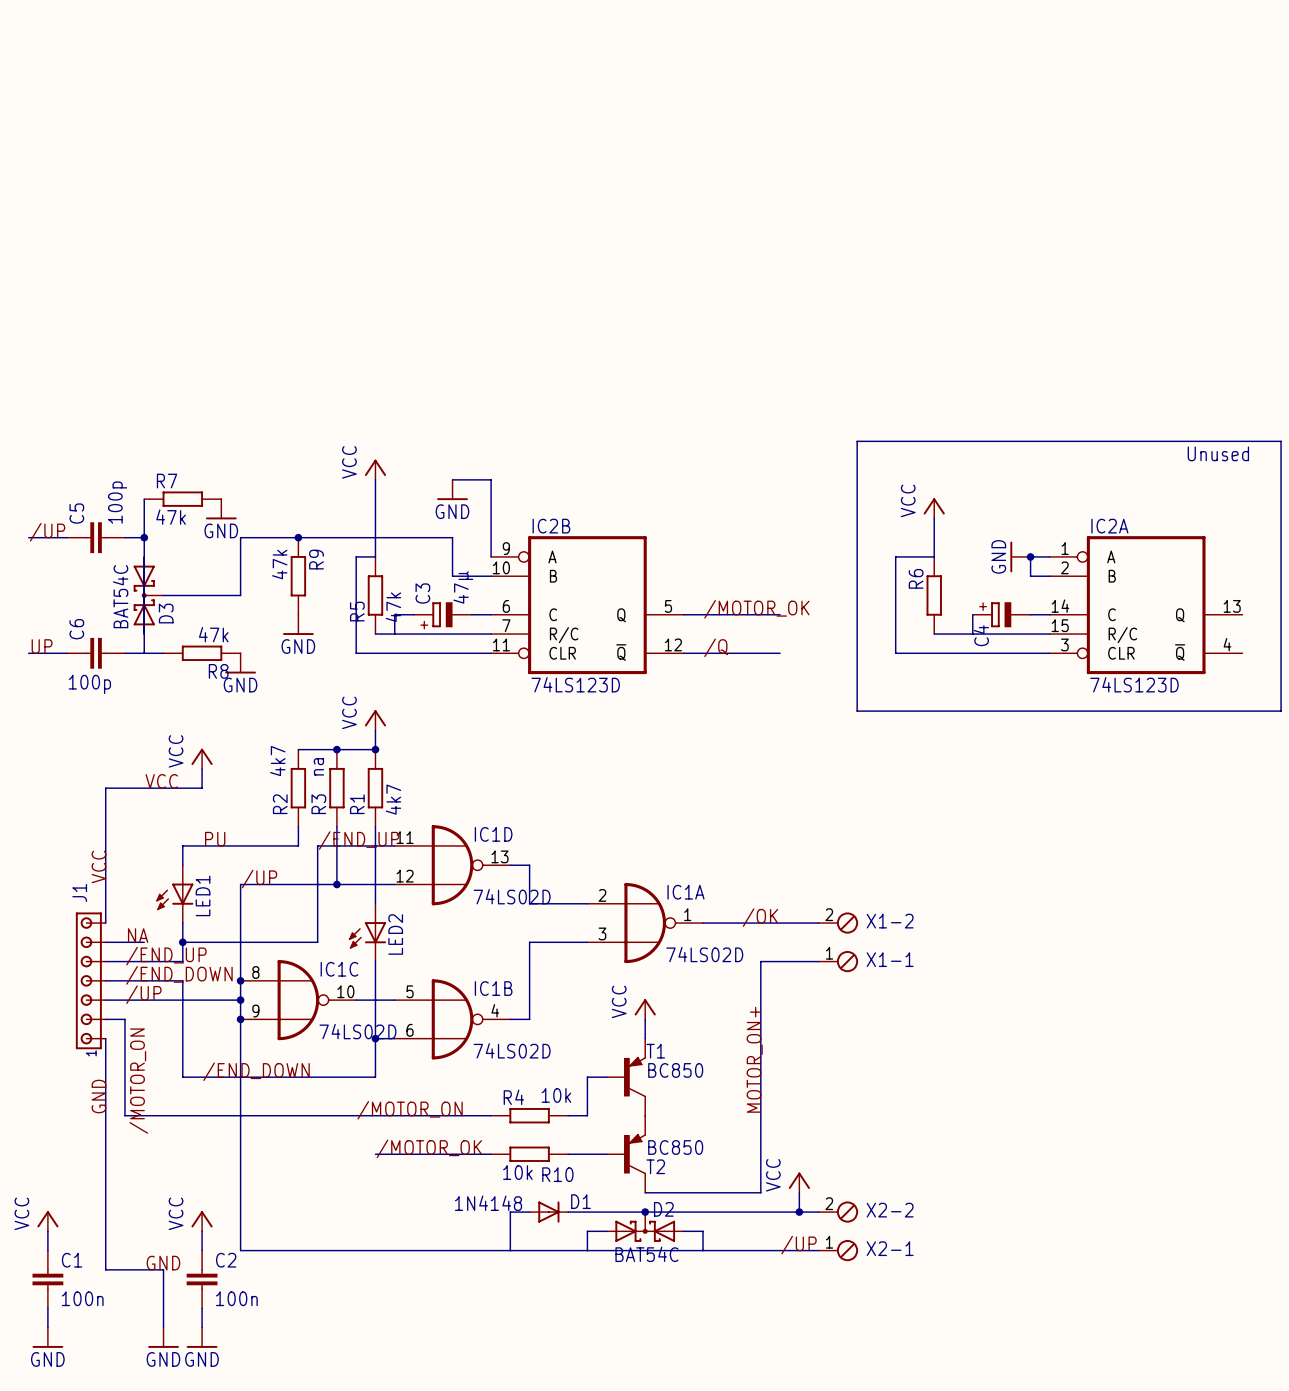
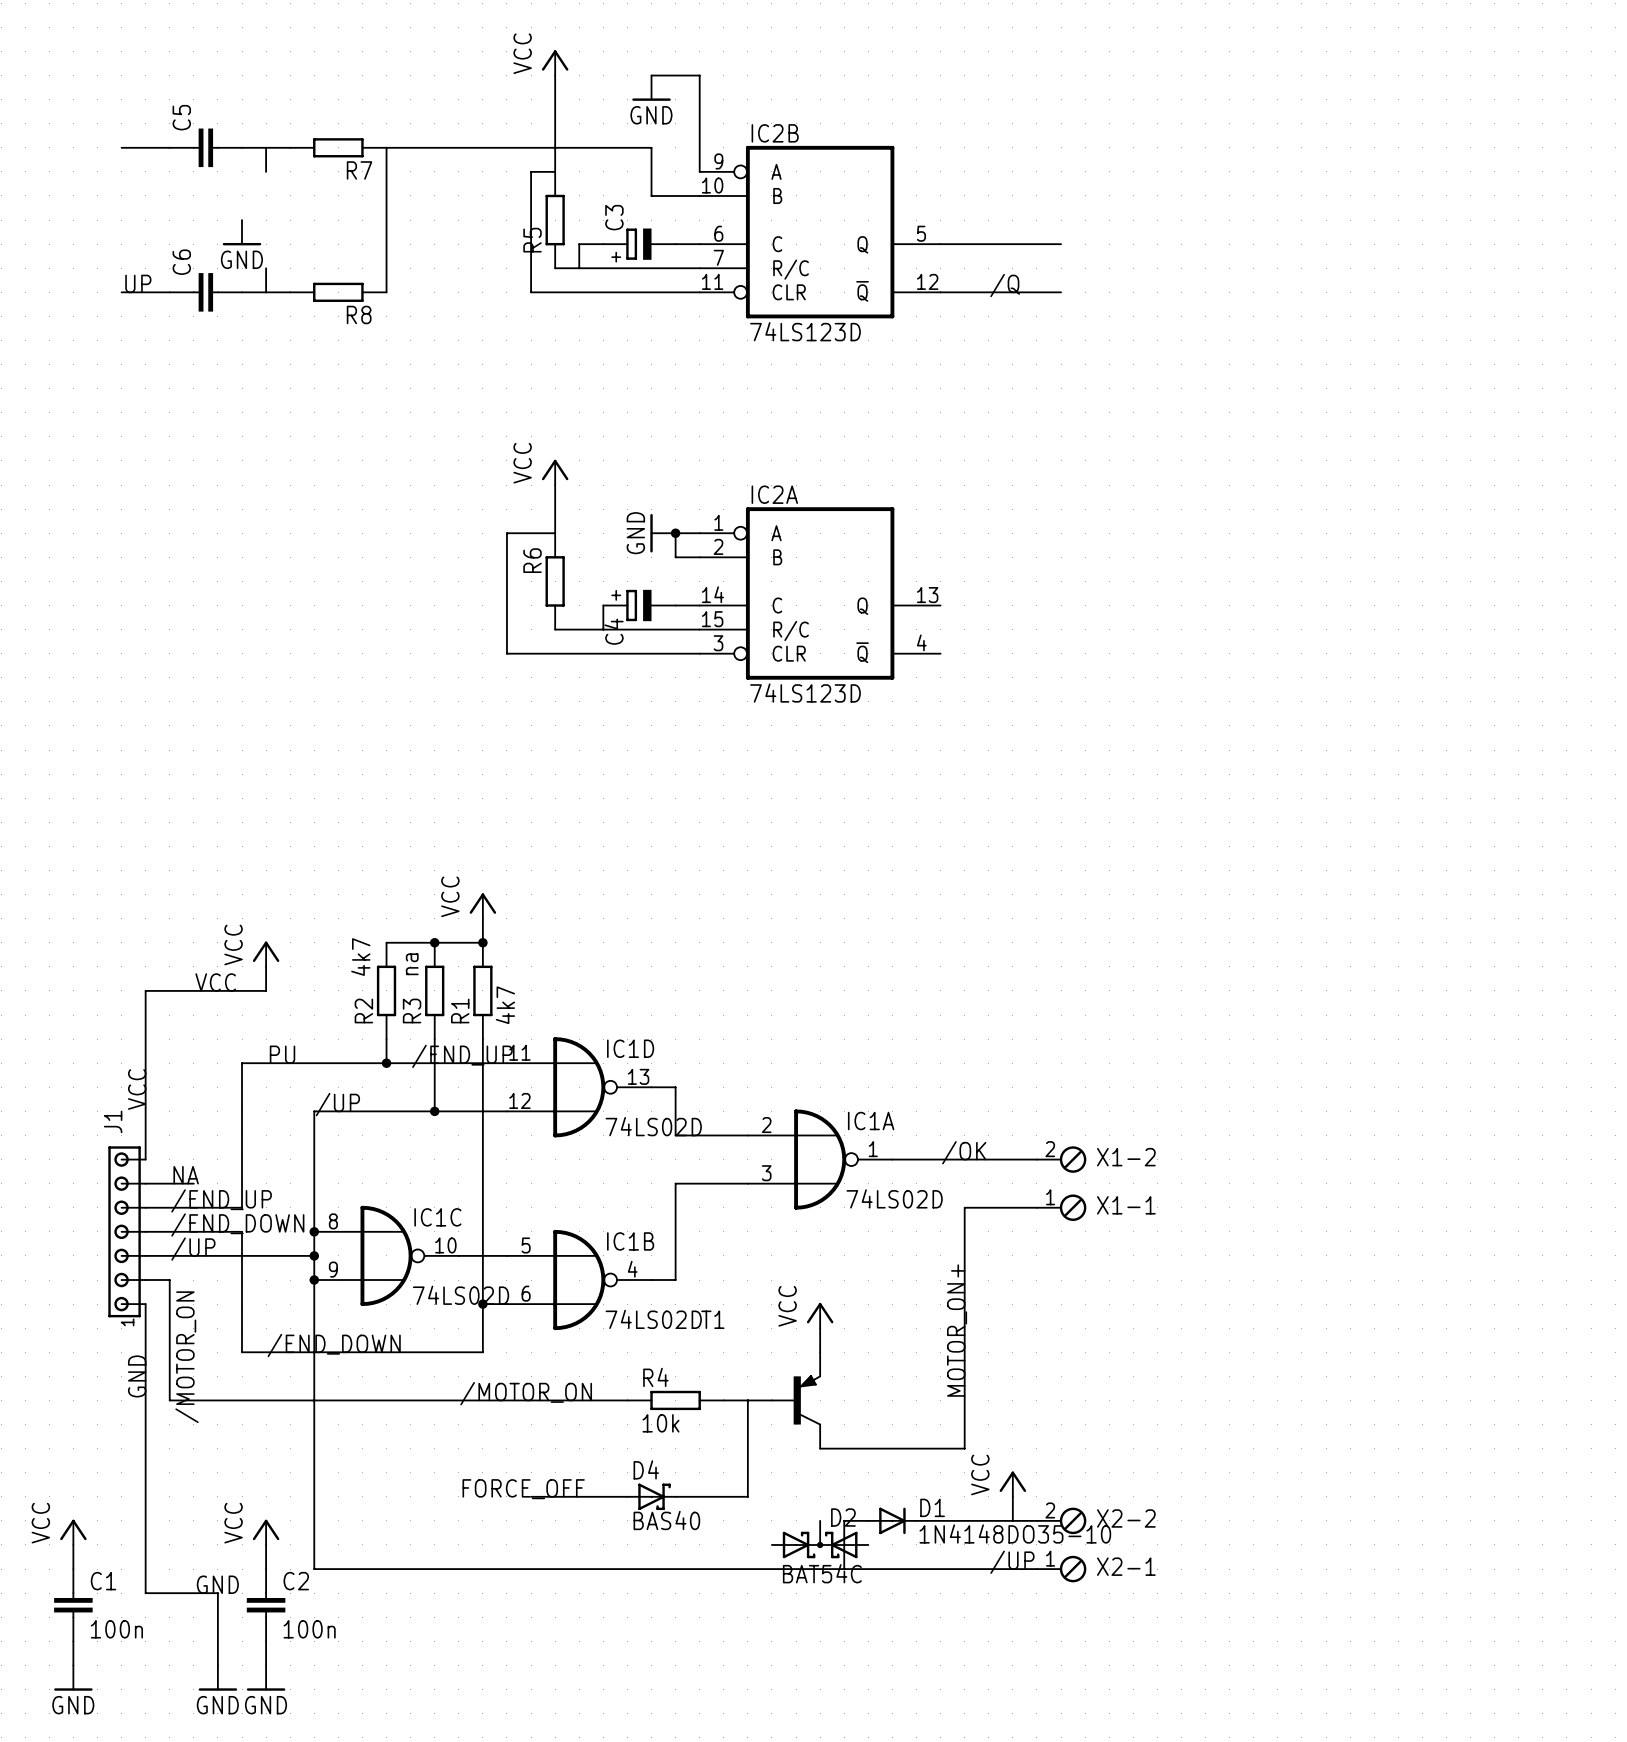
power symbol: none -> VCC (555, 62)
wire: none -> (555, 75) (555, 171) (531, 171) (531, 292) (699, 292)
wire: none -> (651, 75) (699, 75) (699, 171)
power symbol: none -> GND (651, 88)
wire: none -> (121, 147) (169, 147)
wire: none -> (242, 147) (290, 147)
wire: none -> (266, 147) (266, 171)
wire: none -> (699, 195) (651, 195) (651, 147) (386, 147) (386, 292)
power symbol: none -> GND (242, 232)
wire: none -> (603, 244) (579, 244) (579, 268)
wire: none -> (675, 244) (699, 244)
wire: none -> (940, 244) (1061, 244)
wire: none -> (266, 268) (266, 292)
wire: none -> (555, 268) (699, 268)
label: none -> UP (138, 283)
label: none -> /Q (1005, 285)
wire: none -> (121, 292) (169, 292)
wire: none -> (242, 292) (290, 292)
wire: none -> (940, 292) (1061, 292)
wire: none -> (555, 485) (555, 533) (506, 533) (506, 653) (699, 653)
junction: none -> (675, 533)
wire: none -> (699, 533) (675, 533) (675, 557) (699, 557)
line: (857, 441) (1281, 441) (1281, 711) (857, 711) (857, 441) -> none
text: Unused (1218, 453) -> none
power symbol position: VCC (375, 469) -> VCC (555, 472)
wire: (375, 479) (375, 556) (356, 556) (356, 653) (491, 653) -> none
wire: (452, 479) (491, 479) (491, 556) -> none
wire: none -> (603, 605) (603, 629)
R7 name position: R7 (167, 481) -> R7 (359, 170)
power symbol position: GND (452, 490) -> GND (662, 533)
wire: (144, 499) (144, 653) -> none
R7 position: (182, 499) -> (338, 147)
power symbol rotation: 0° (452, 499) -> 90° clockwise (651, 533)
C5 value: 100p (117, 502) -> none
power symbol: VCC (934, 508) -> none
power symbol: GND (221, 509) -> none
R7 value: 47k (171, 517) -> none
wire: (934, 518) (934, 556) (895, 556) (895, 653) (1049, 653) -> none
label: /UP (47, 532) -> none
wire: (28, 537) (67, 537) -> none
C5 position: (96, 537) -> (205, 147)
wire: (124, 537) (144, 537) -> none
junction: (144, 537) -> none
junction: (298, 537) -> none
power symbol: GND (1020, 556) -> none
junction: (1030, 556) -> none
wire: (1049, 556) (1030, 556) (1030, 576) (1049, 576) -> none
R9: 47k (298, 576) -> none
wire: (491, 576) (452, 576) (452, 537) (240, 537) (240, 595) (163, 595) -> none
C3 value: 47µ (463, 587) -> none
D3: BAT54C (148, 595) -> none
R5 position: (375, 595) -> (555, 220)
R6 position: (934, 595) -> (555, 581)
IC2B position: (587, 605) -> (820, 232)
IC2A position: (1146, 605) -> (820, 593)
R5 value: 47k (393, 607) -> none
label: /MOTOR_OK (756, 609) -> none
wire: (414, 614) (394, 614) (394, 634) -> none
C3 position: (442, 614) -> (639, 244)
wire: (471, 614) (491, 614) -> (675, 605) (699, 605)
wire: (683, 614) (780, 614) -> none
wire: (972, 614) (972, 634) -> none
C4 position: (1001, 614) -> (639, 605)
wire: (1030, 614) (1049, 614) -> none
power symbol: GND (298, 624) -> none
R8 value: 47k (213, 634) -> none
wire: (375, 634) (491, 634) -> (555, 629) (699, 629)
wire: (934, 634) (1049, 634) -> none
label: UP (42, 646) -> none
label: /Q (716, 647) -> none
wire: (28, 653) (67, 653) -> none
C6 position: (96, 653) -> (205, 292)
wire: (124, 653) (163, 653) -> none
R8 position: (202, 653) -> (338, 292)
wire: (683, 653) (780, 653) -> none
power symbol: GND (240, 663) -> none
C6 value: 100p (89, 684) -> none
junction: none -> (386, 1063)
wire: (317, 845) (317, 942) (182, 942) -> (410, 1063) (386, 1063)
LED1: (174, 894) -> none
LED2: (367, 932) -> none
junction: (182, 942) -> none
power symbol position: VCC (645, 1009) -> VCC (820, 1315)
wire: (645, 1019) (645, 1038) -> (820, 1328) (820, 1352)
T1 name position: T1 (655, 1051) -> T1 (712, 1319)
T1 value: BC850 (675, 1070) -> none
wire: (606, 1077) (587, 1077) (587, 1115) -> none
T1 position: (626, 1077) -> (796, 1400)
R4 value position: 10k (556, 1095) -> 10k (660, 1423)
wire: none -> (771, 1400) (747, 1400) (747, 1496) (675, 1496)
label: /MOTOR_OK (429, 1148) -> none
wire: (375, 1154) (491, 1154) -> none
R10: 10k (529, 1154) -> none
wire: (568, 1154) (606, 1154) -> none
T2: BC850 (626, 1154) -> none
wire: (760, 1154) (760, 1192) (645, 1192) -> (964, 1448) (820, 1448)
label: none -> FORCE_OFF (523, 1489)
wire: none -> (531, 1496) (627, 1496)
D4: none -> BAS40 (651, 1496)
D1 value: 1N4148 (488, 1203) -> 1N4148DO35-10 (1015, 1533)
wire: (529, 1212) (510, 1212) (510, 1250) -> none
D1 position: (548, 1212) -> (892, 1520)
wire: (568, 1212) (664, 1212) -> (844, 1569) (844, 1520)
junction: (645, 1212) -> none
junction: (799, 1212) -> none
wire: (606, 1231) (587, 1231) (587, 1250) -> none
wire: (683, 1231) (703, 1231) (703, 1250) -> none

